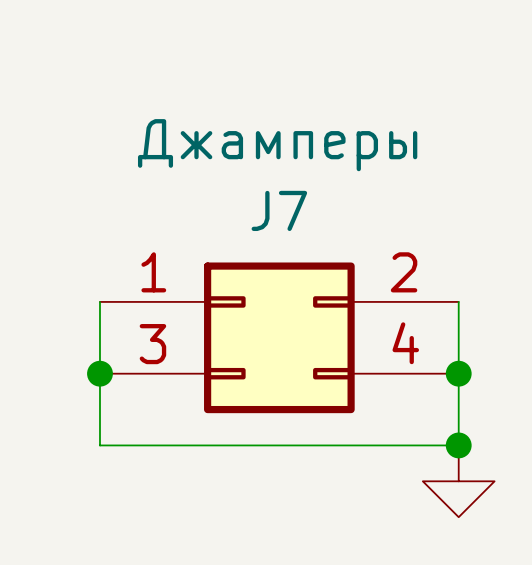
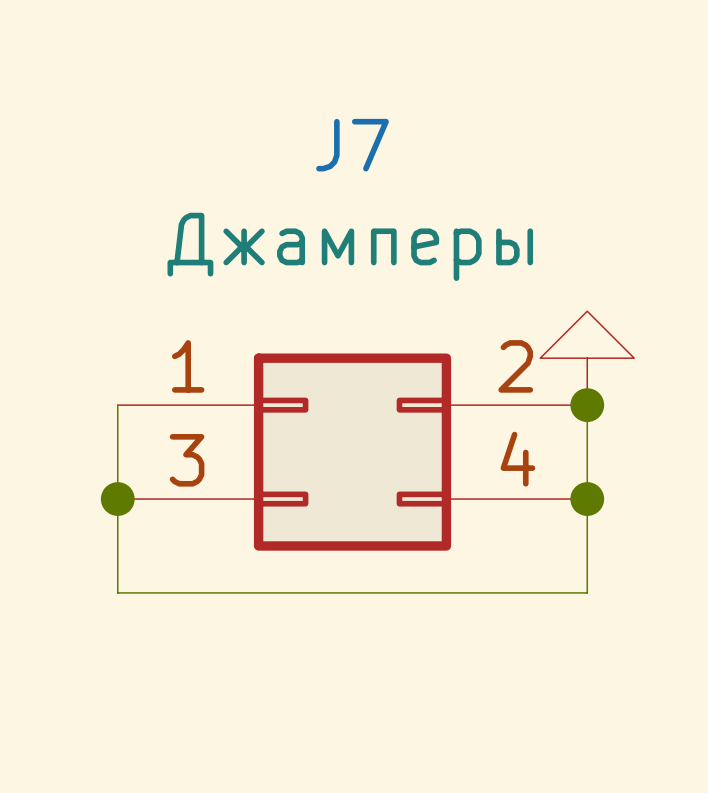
J7 value position: Джамперы (277, 145) -> Джамперы (350, 246)
J7 name position: J7 (279, 210) -> J7 (352, 145)
junction position: (458, 445) -> (587, 405)
power symbol rotation: 0° (458, 481) -> 180° (587, 358)
power symbol position: (458, 481) -> (587, 358)

